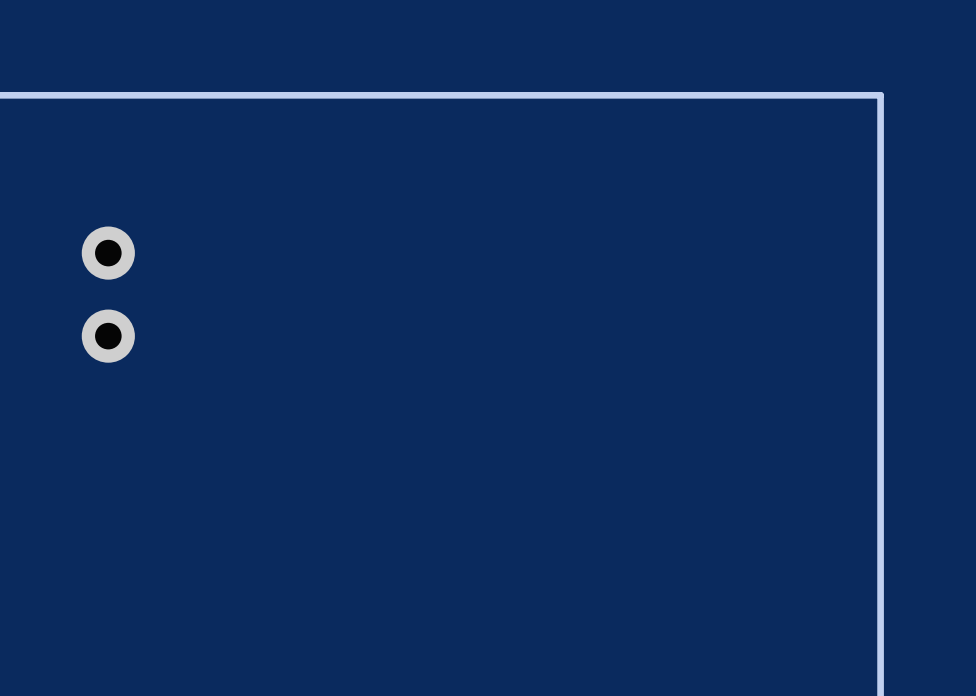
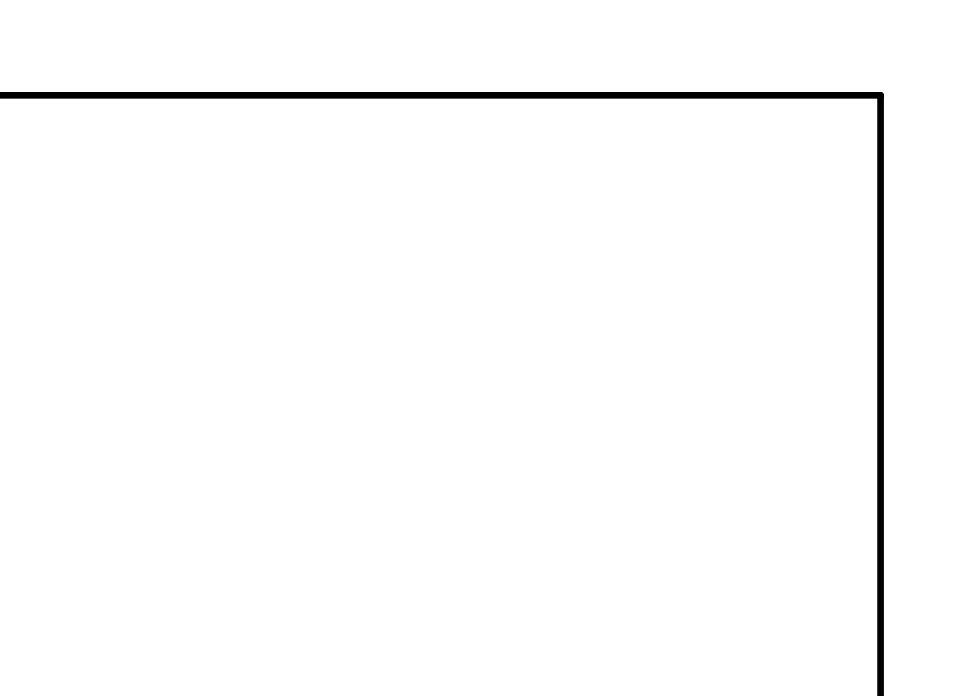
part: (108, 294) -> none

